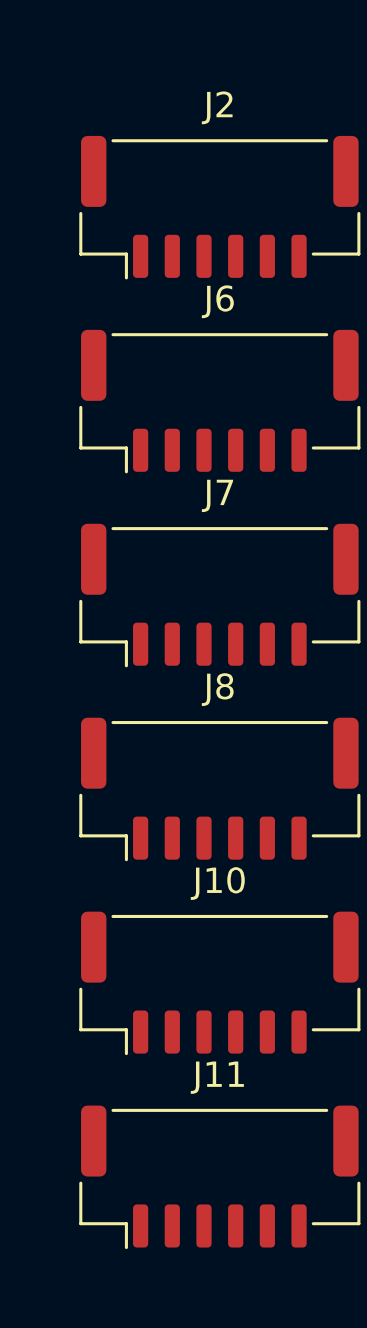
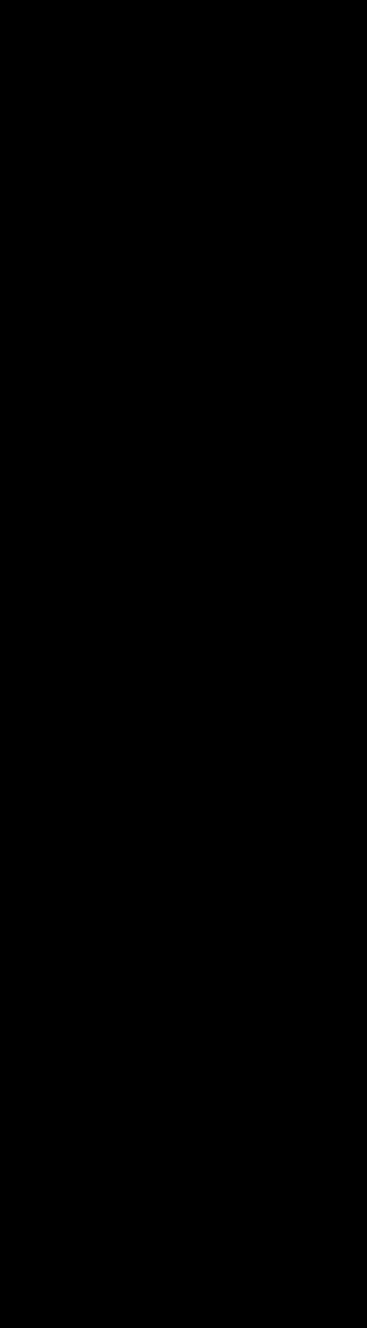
J2: (219, 207) -> none
J6: (219, 401) -> none
J7: (219, 595) -> none
J8: (219, 789) -> none
J10: (219, 983) -> none
J11: (219, 1177) -> none

